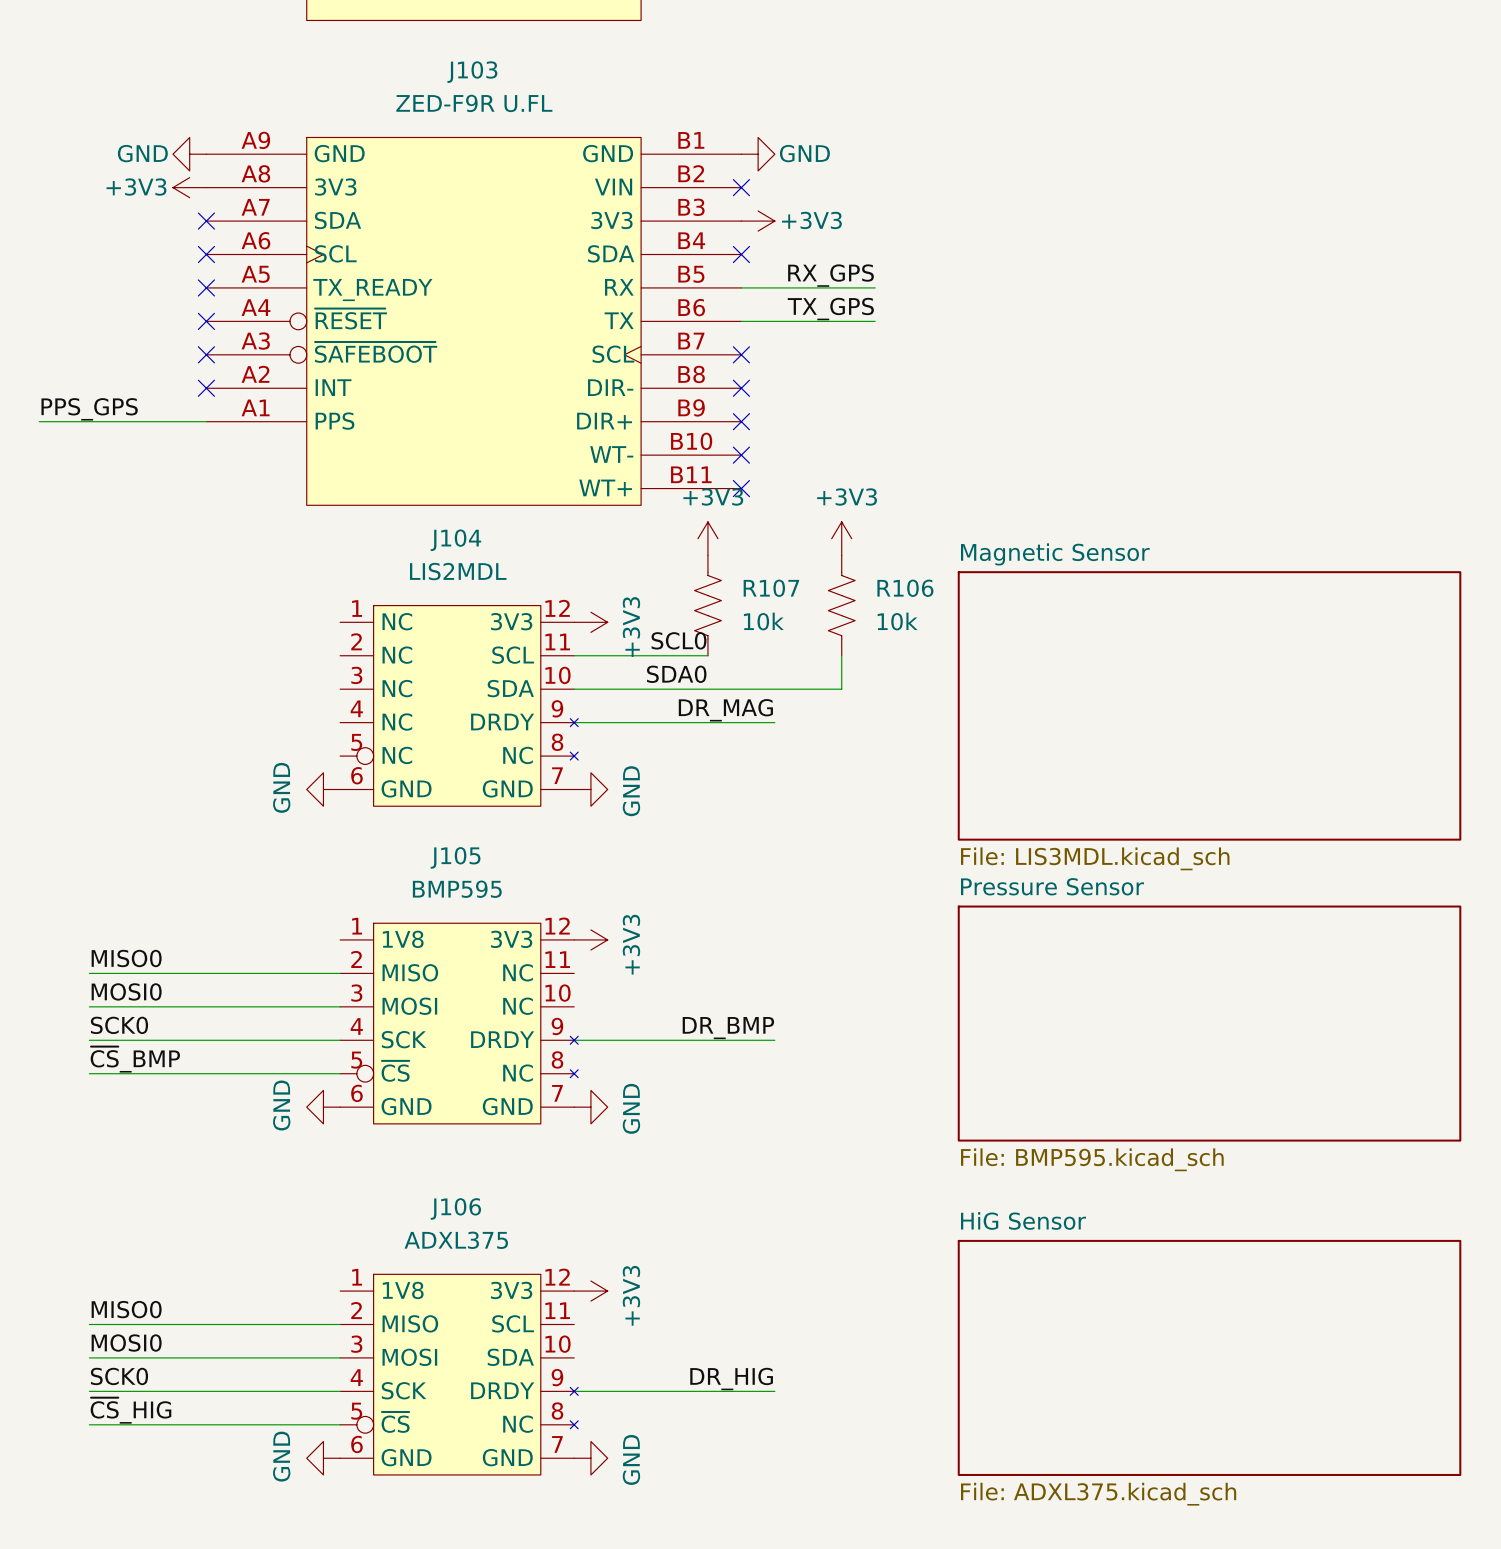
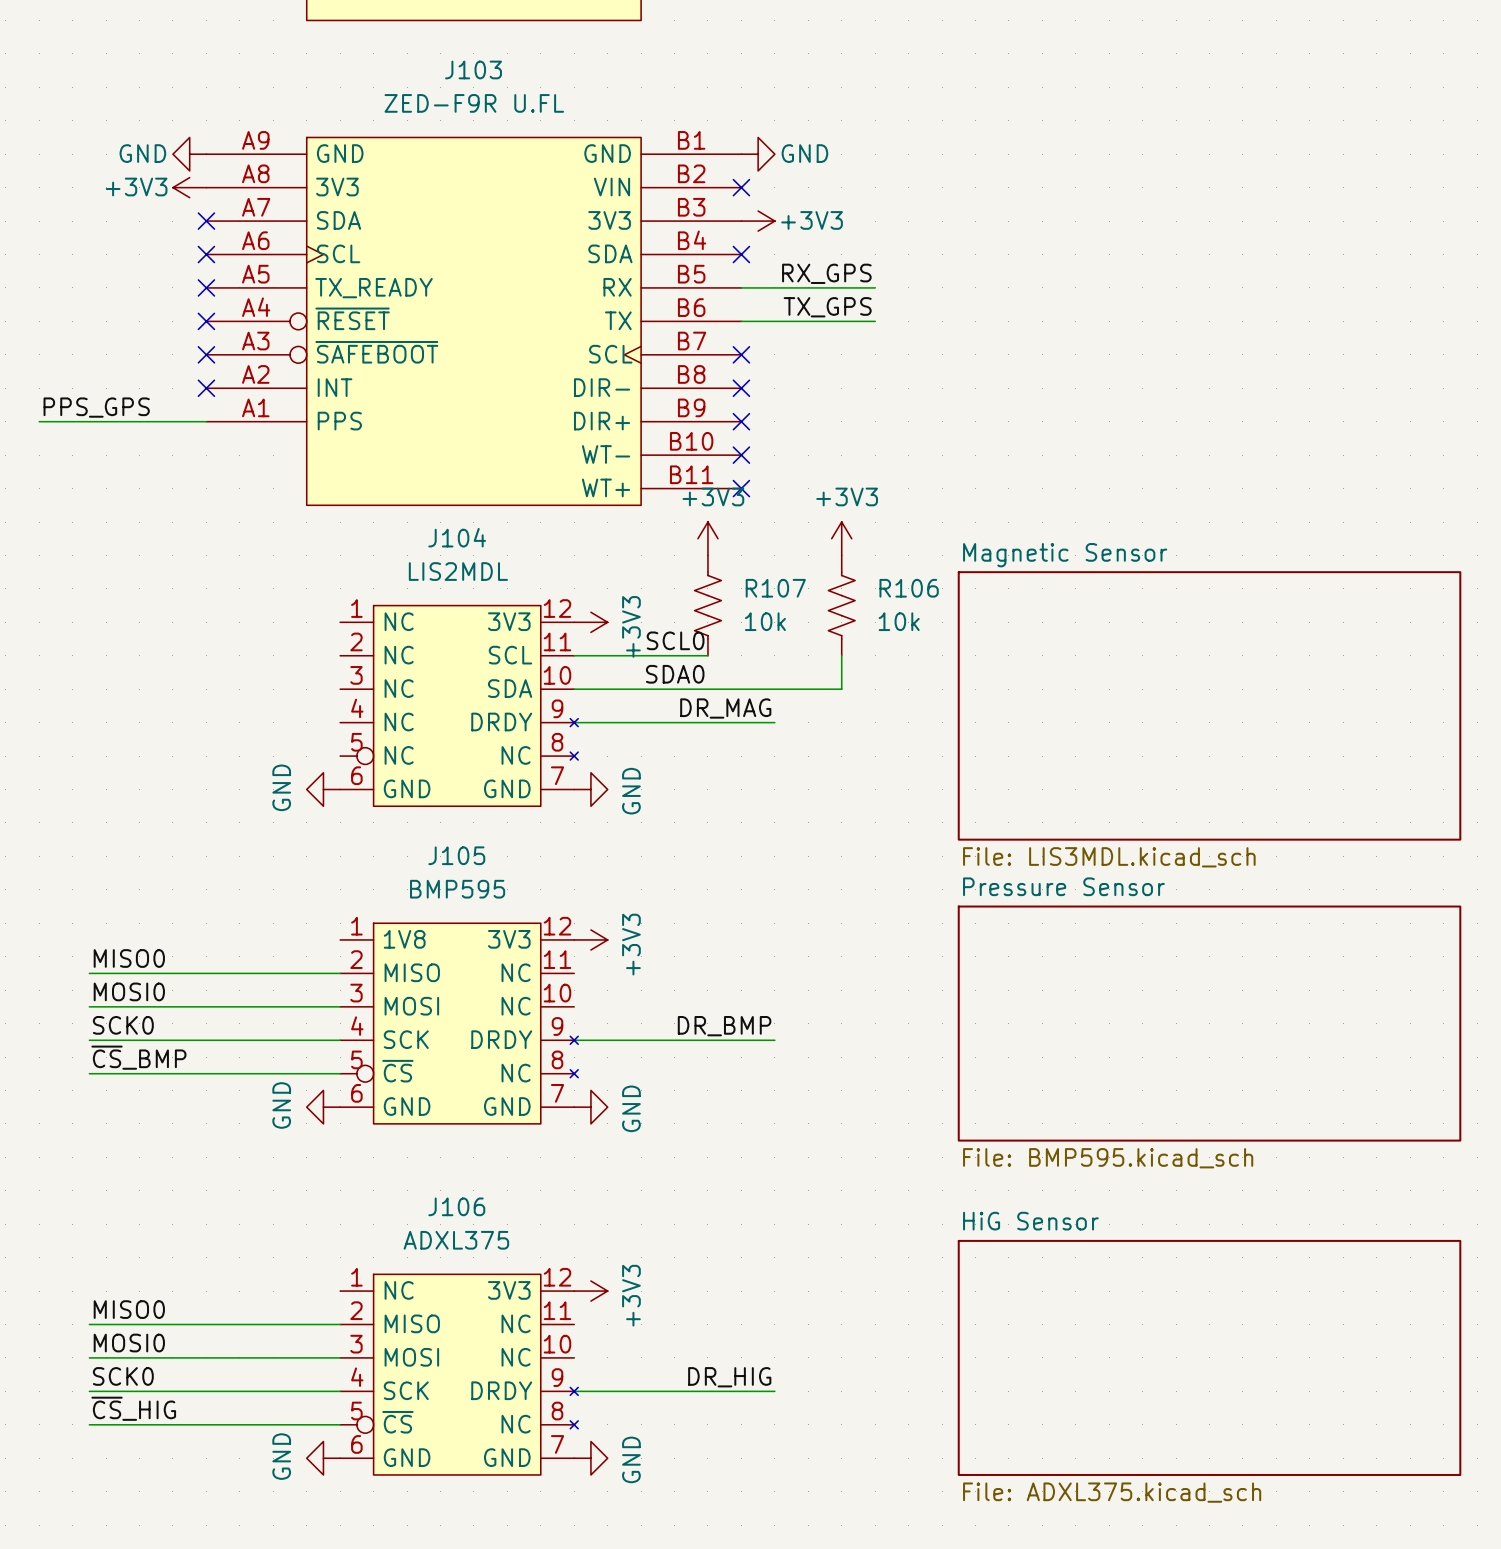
J106 pin name: 1V8 (403, 1290) -> NC (399, 1290)
J106 pin name: SCL (513, 1323) -> NC (516, 1323)
J106 pin name: SDA (510, 1357) -> NC (516, 1357)

